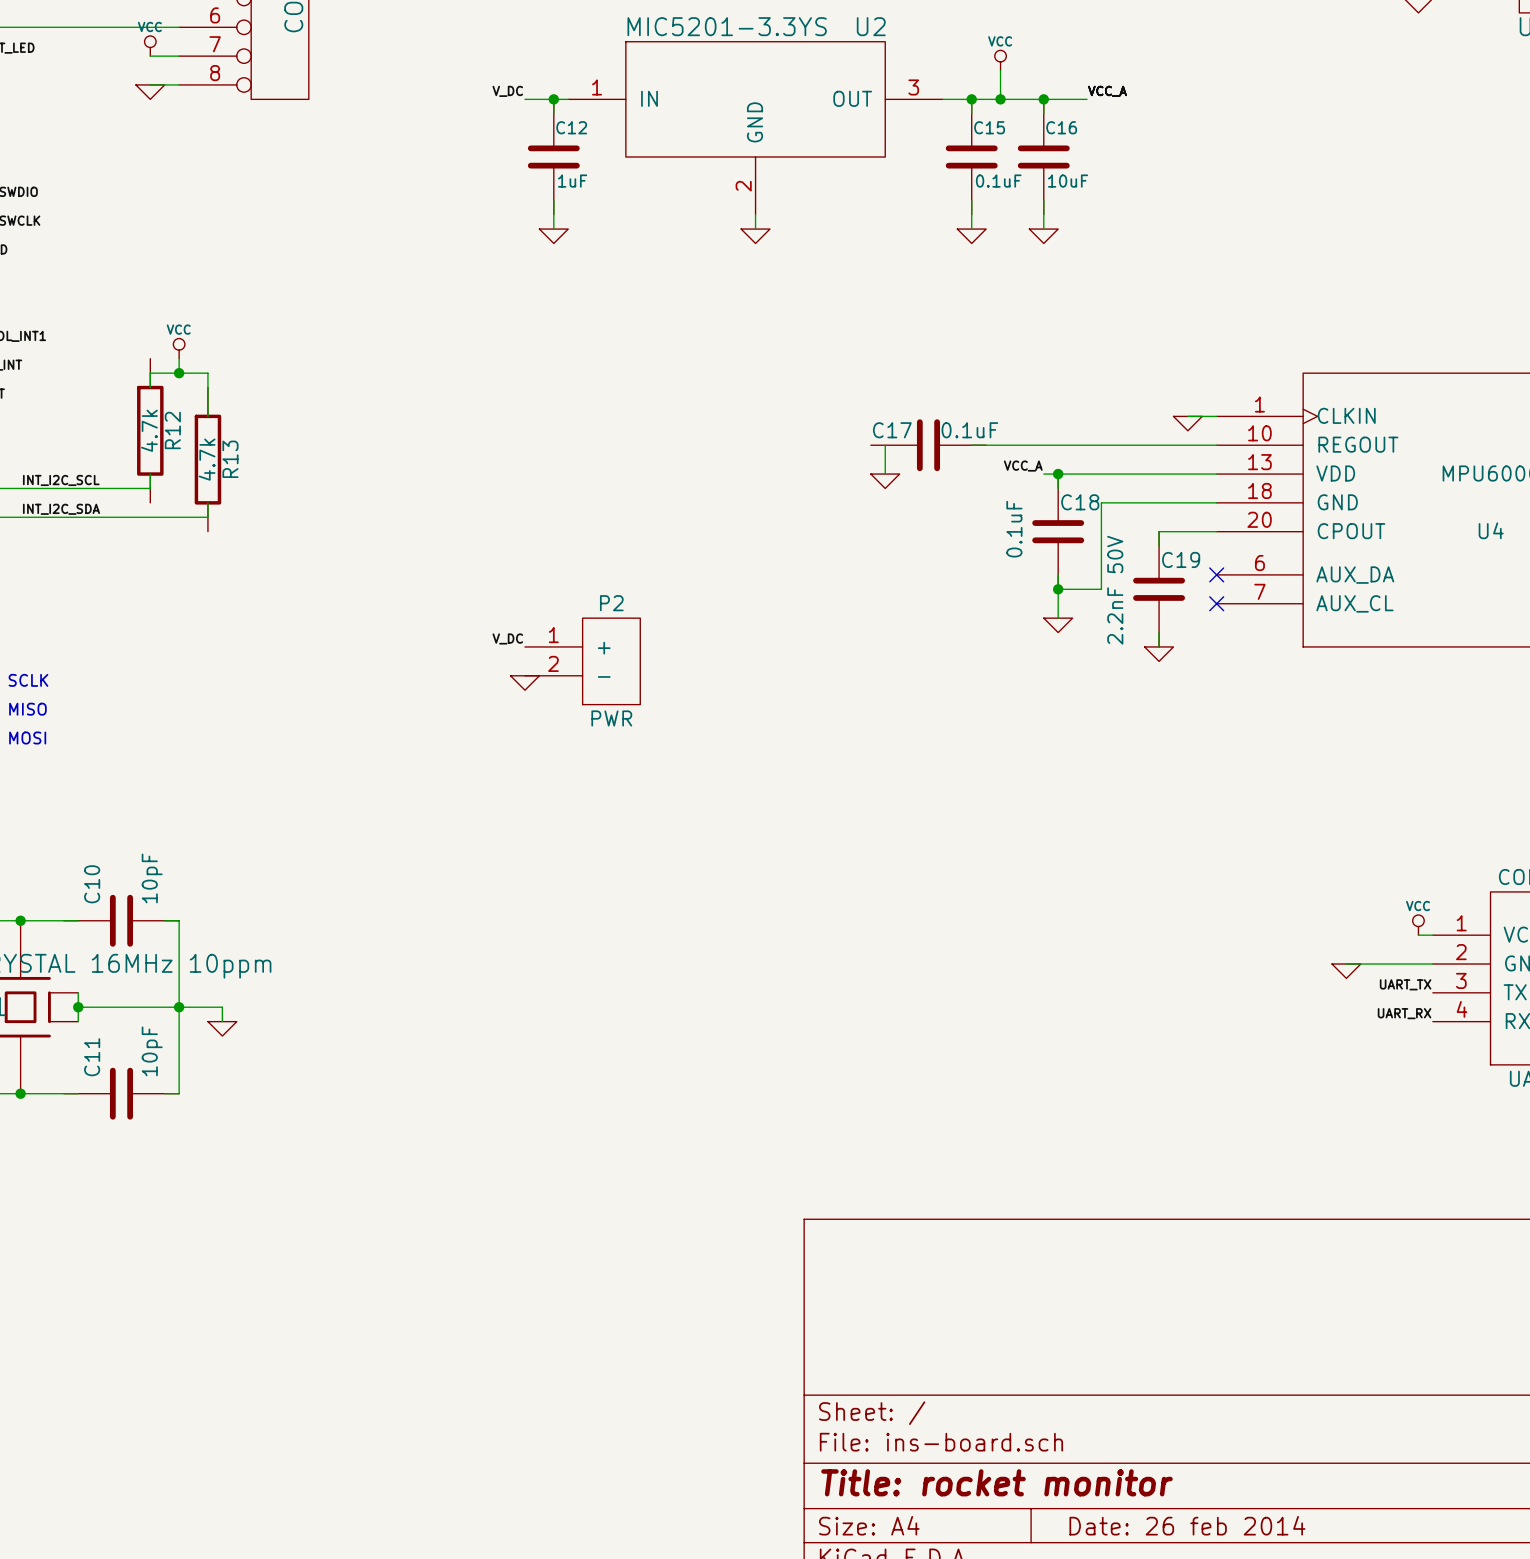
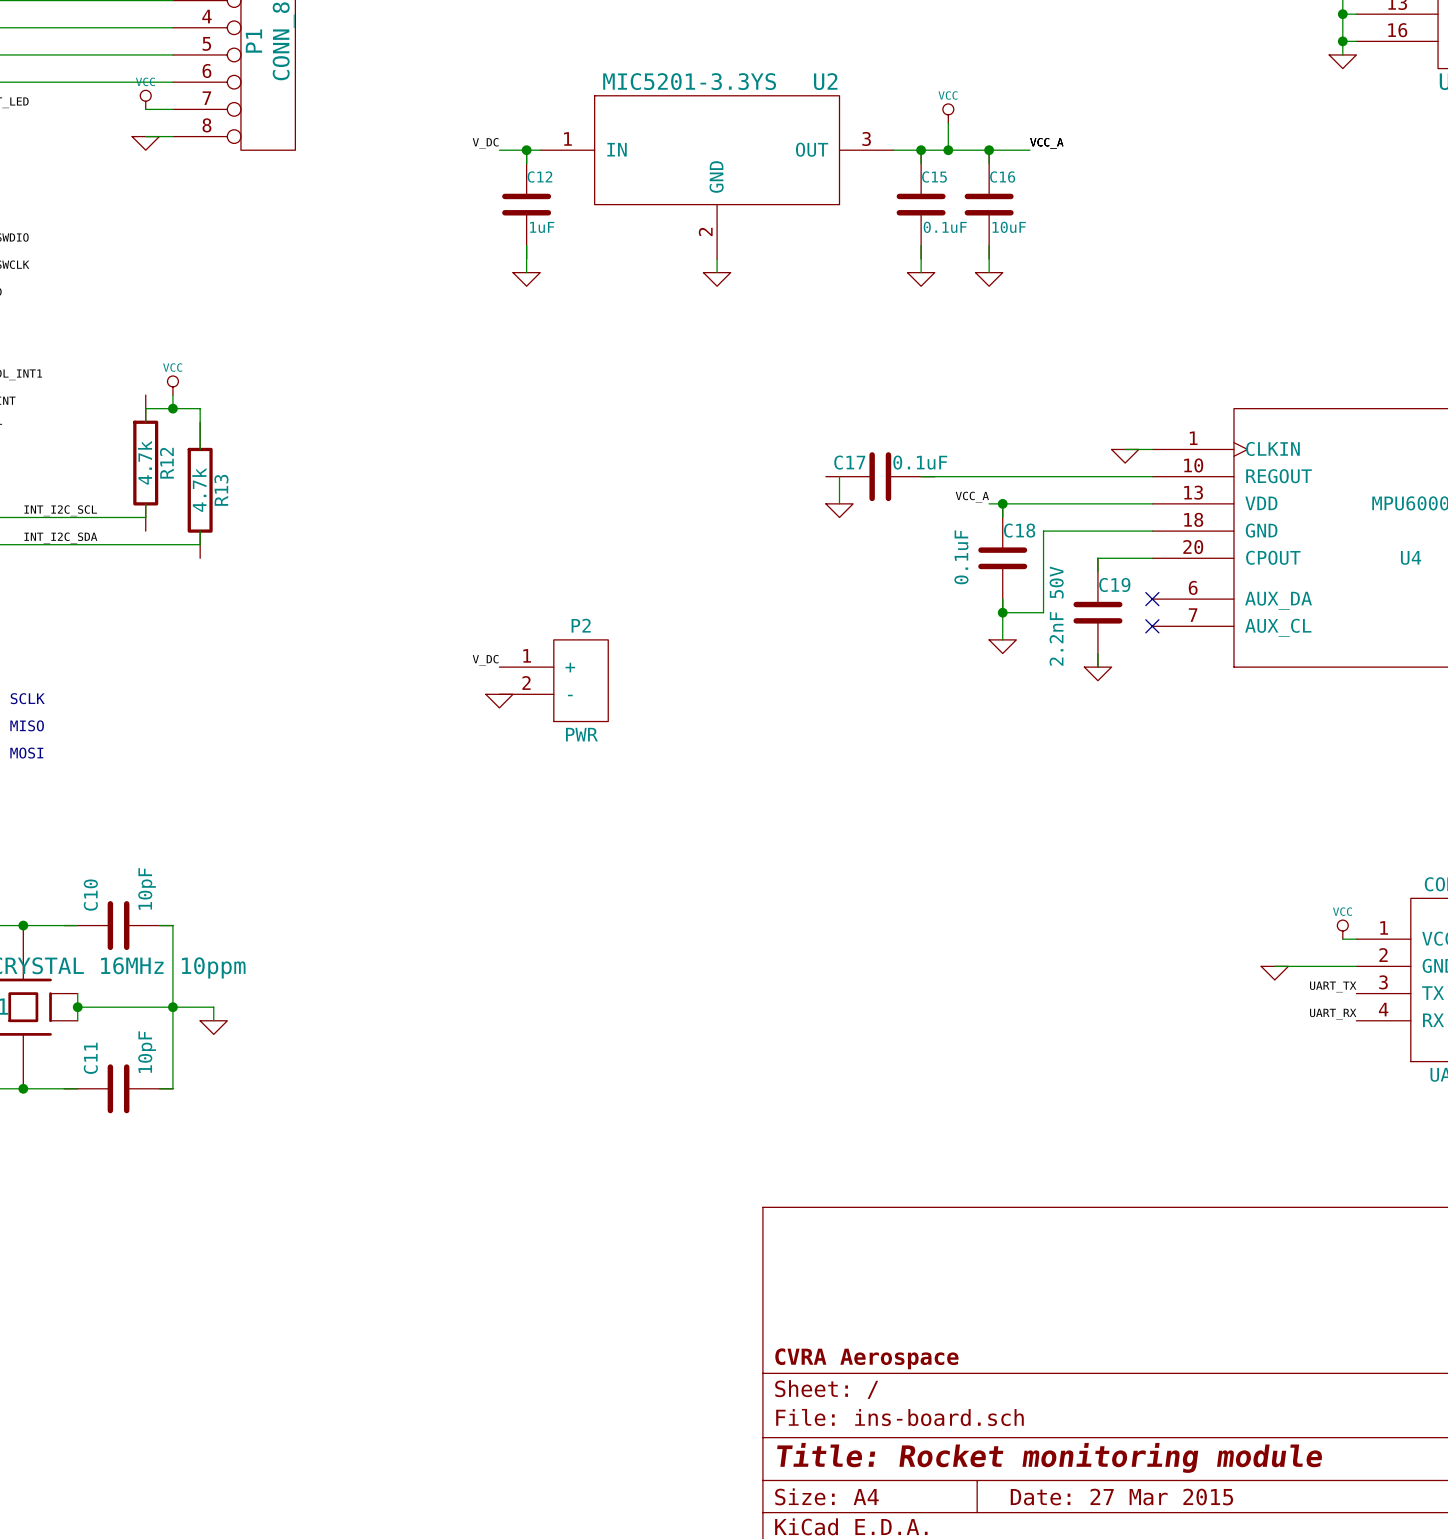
title block: none -> CVRA Aerospace (866, 1358)
title block: Title: rocket monitor (996, 1482) -> Title: Rocket monitoring module (1049, 1457)
title block: Date: 26 feb 2014 (1187, 1525) -> Date: 27 Mar 2015 (1121, 1497)

